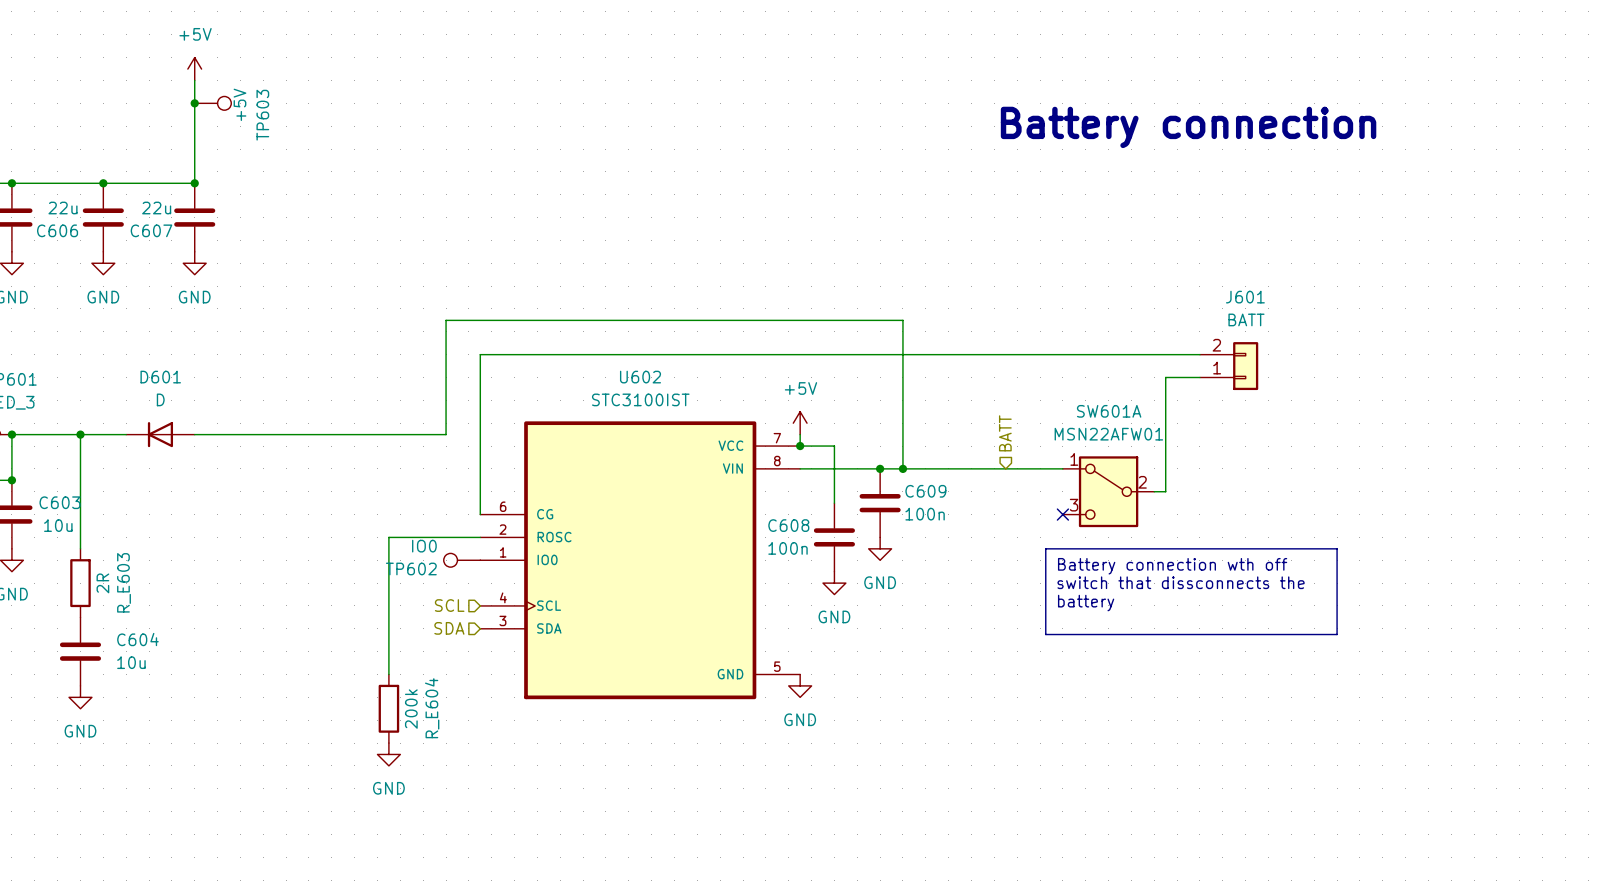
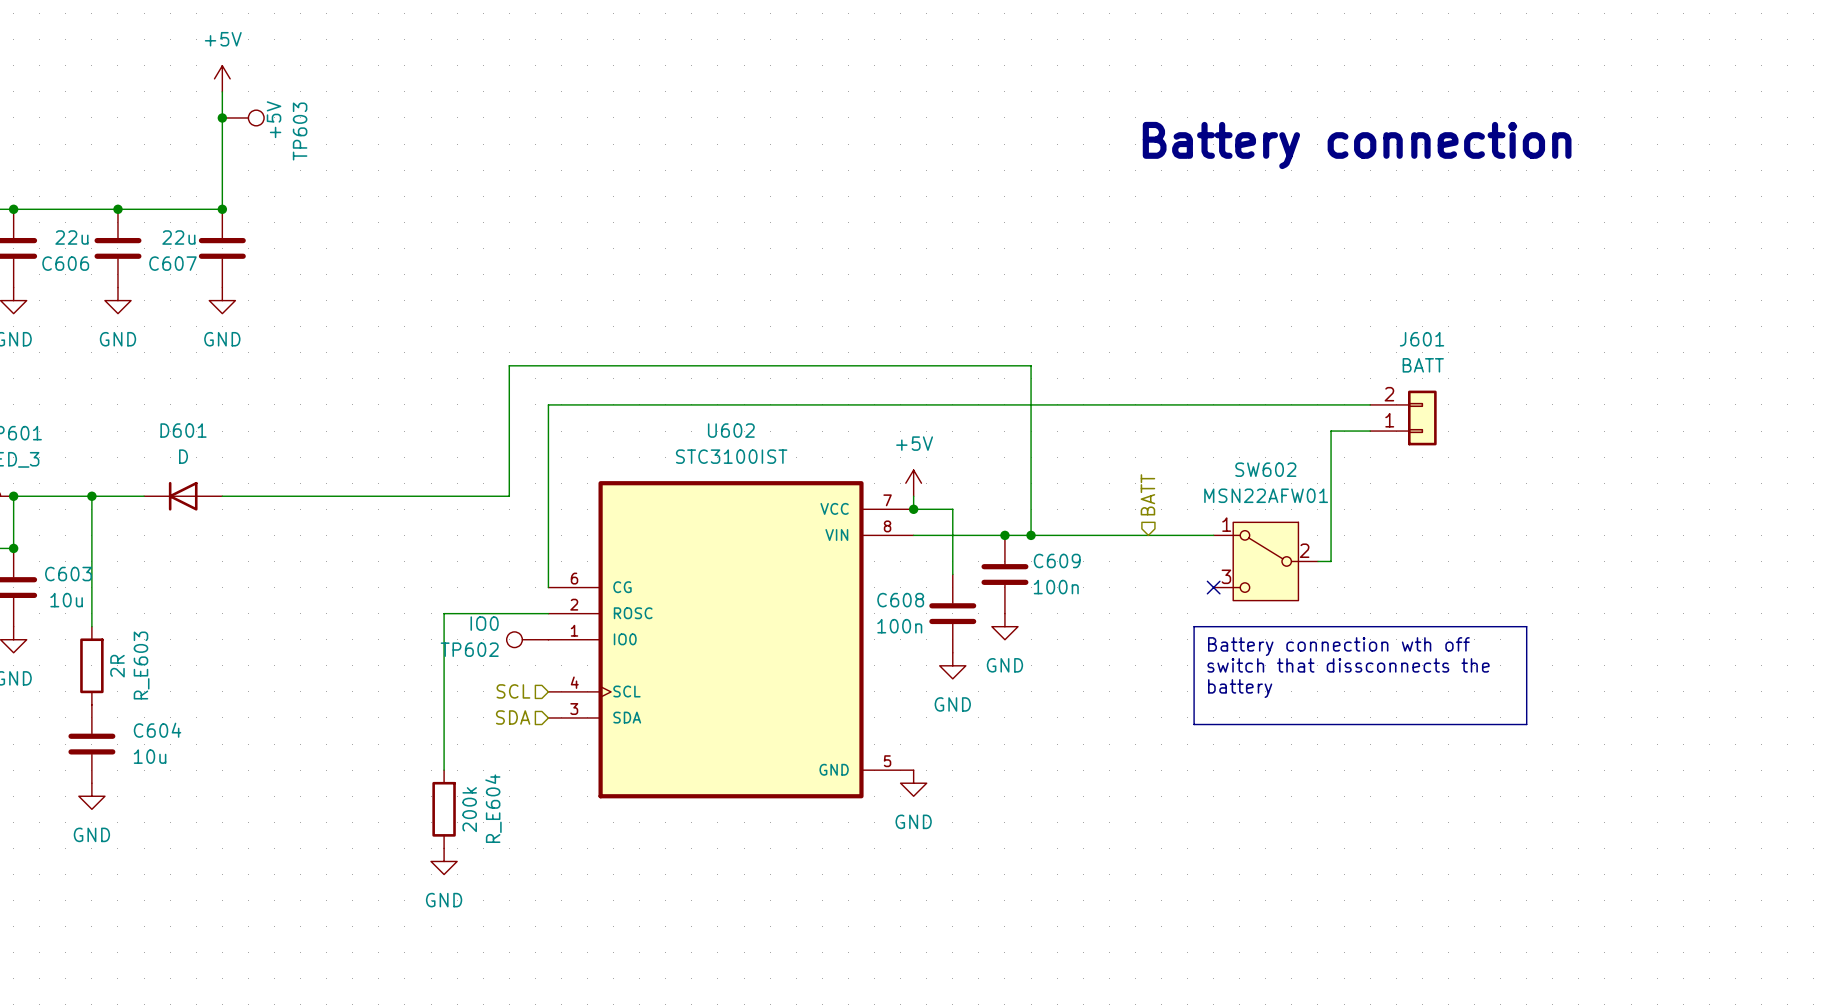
SW601A: MSN22AFW01 (1108, 491) -> none
SW602: none -> MSN22AFW01 (1265, 561)

